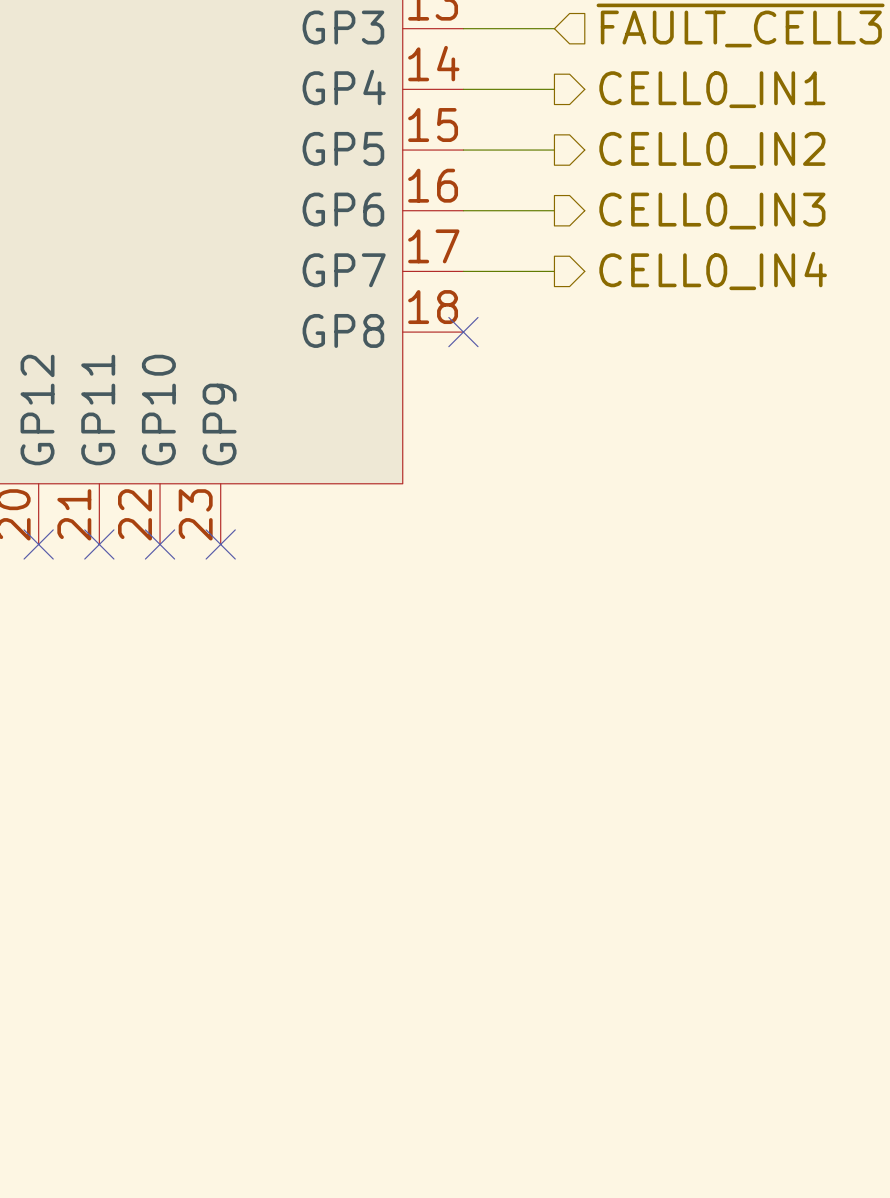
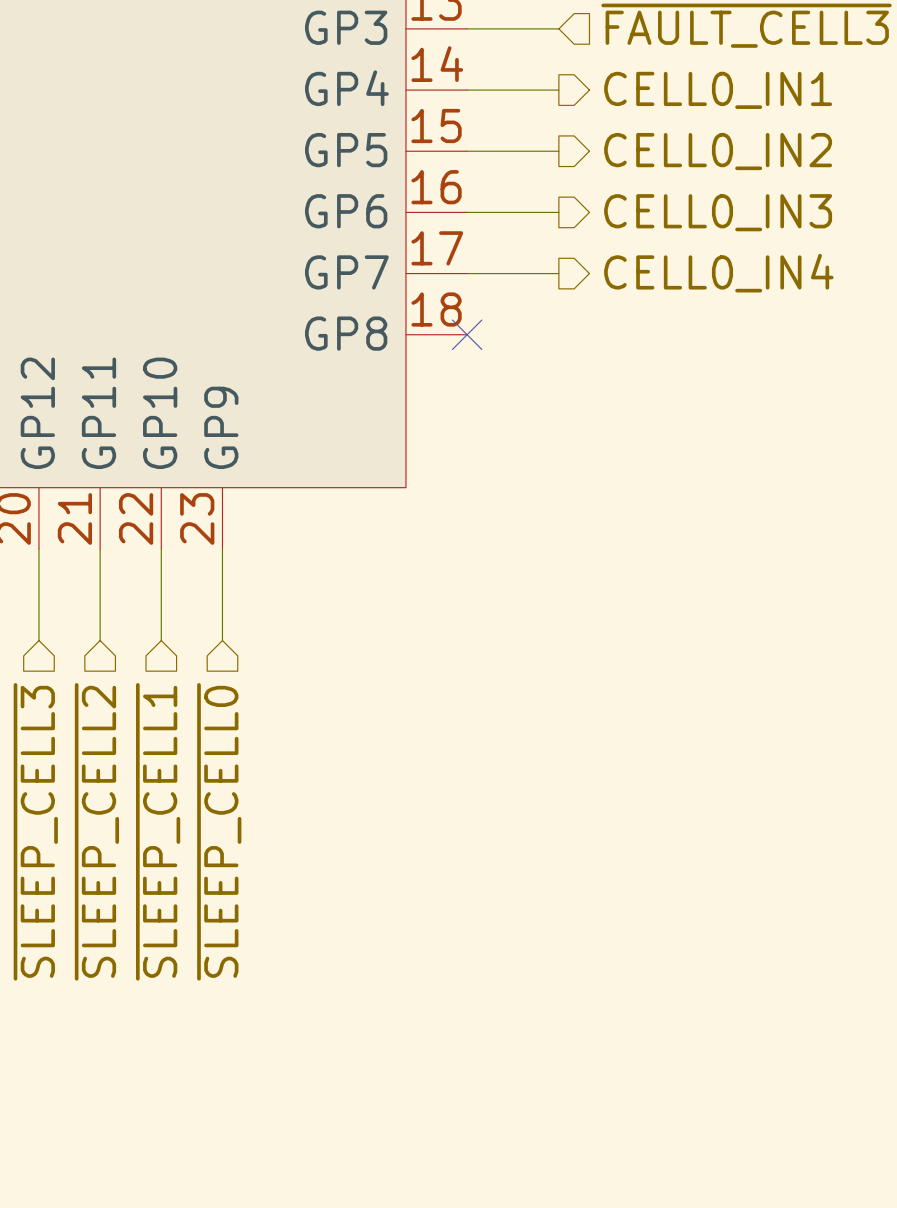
wire: none -> (38, 548) (38, 640)
no-connect mark: (38, 544) -> none
wire: none -> (100, 548) (100, 640)
no-connect mark: (99, 544) -> none
wire: none -> (161, 548) (161, 640)
no-connect mark: (160, 544) -> none
wire: none -> (222, 548) (222, 640)
no-connect mark: (220, 544) -> none
hierarchical label: none -> ~{SLEEP_CELL3} (35, 831)
hierarchical label: none -> ~{SLEEP_CELL2} (96, 831)
hierarchical label: none -> ~{SLEEP_CELL1} (158, 831)
hierarchical label: none -> ~{SLEEP_CELL0} (219, 831)

